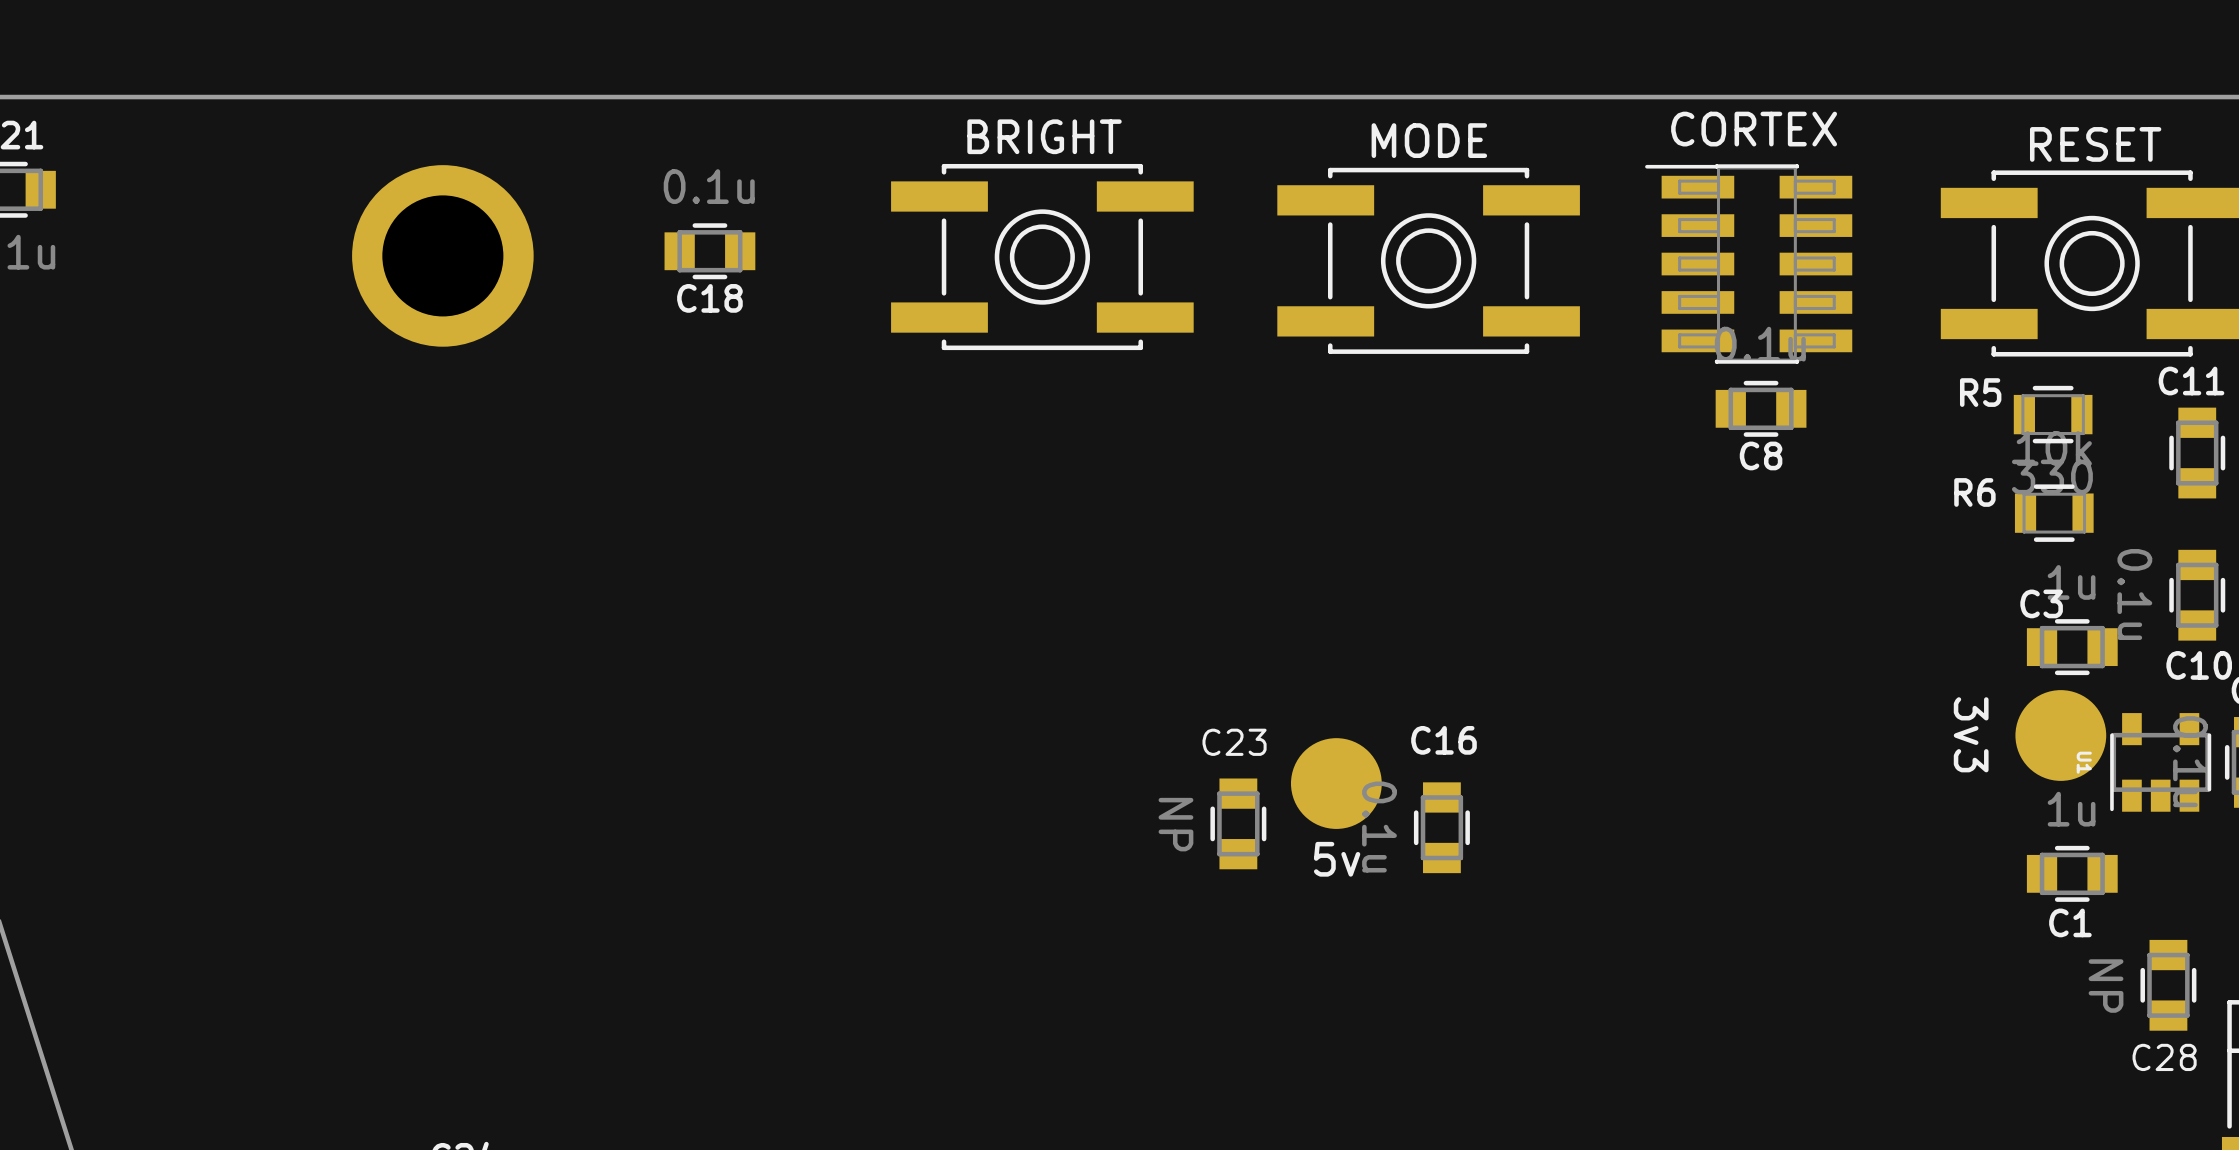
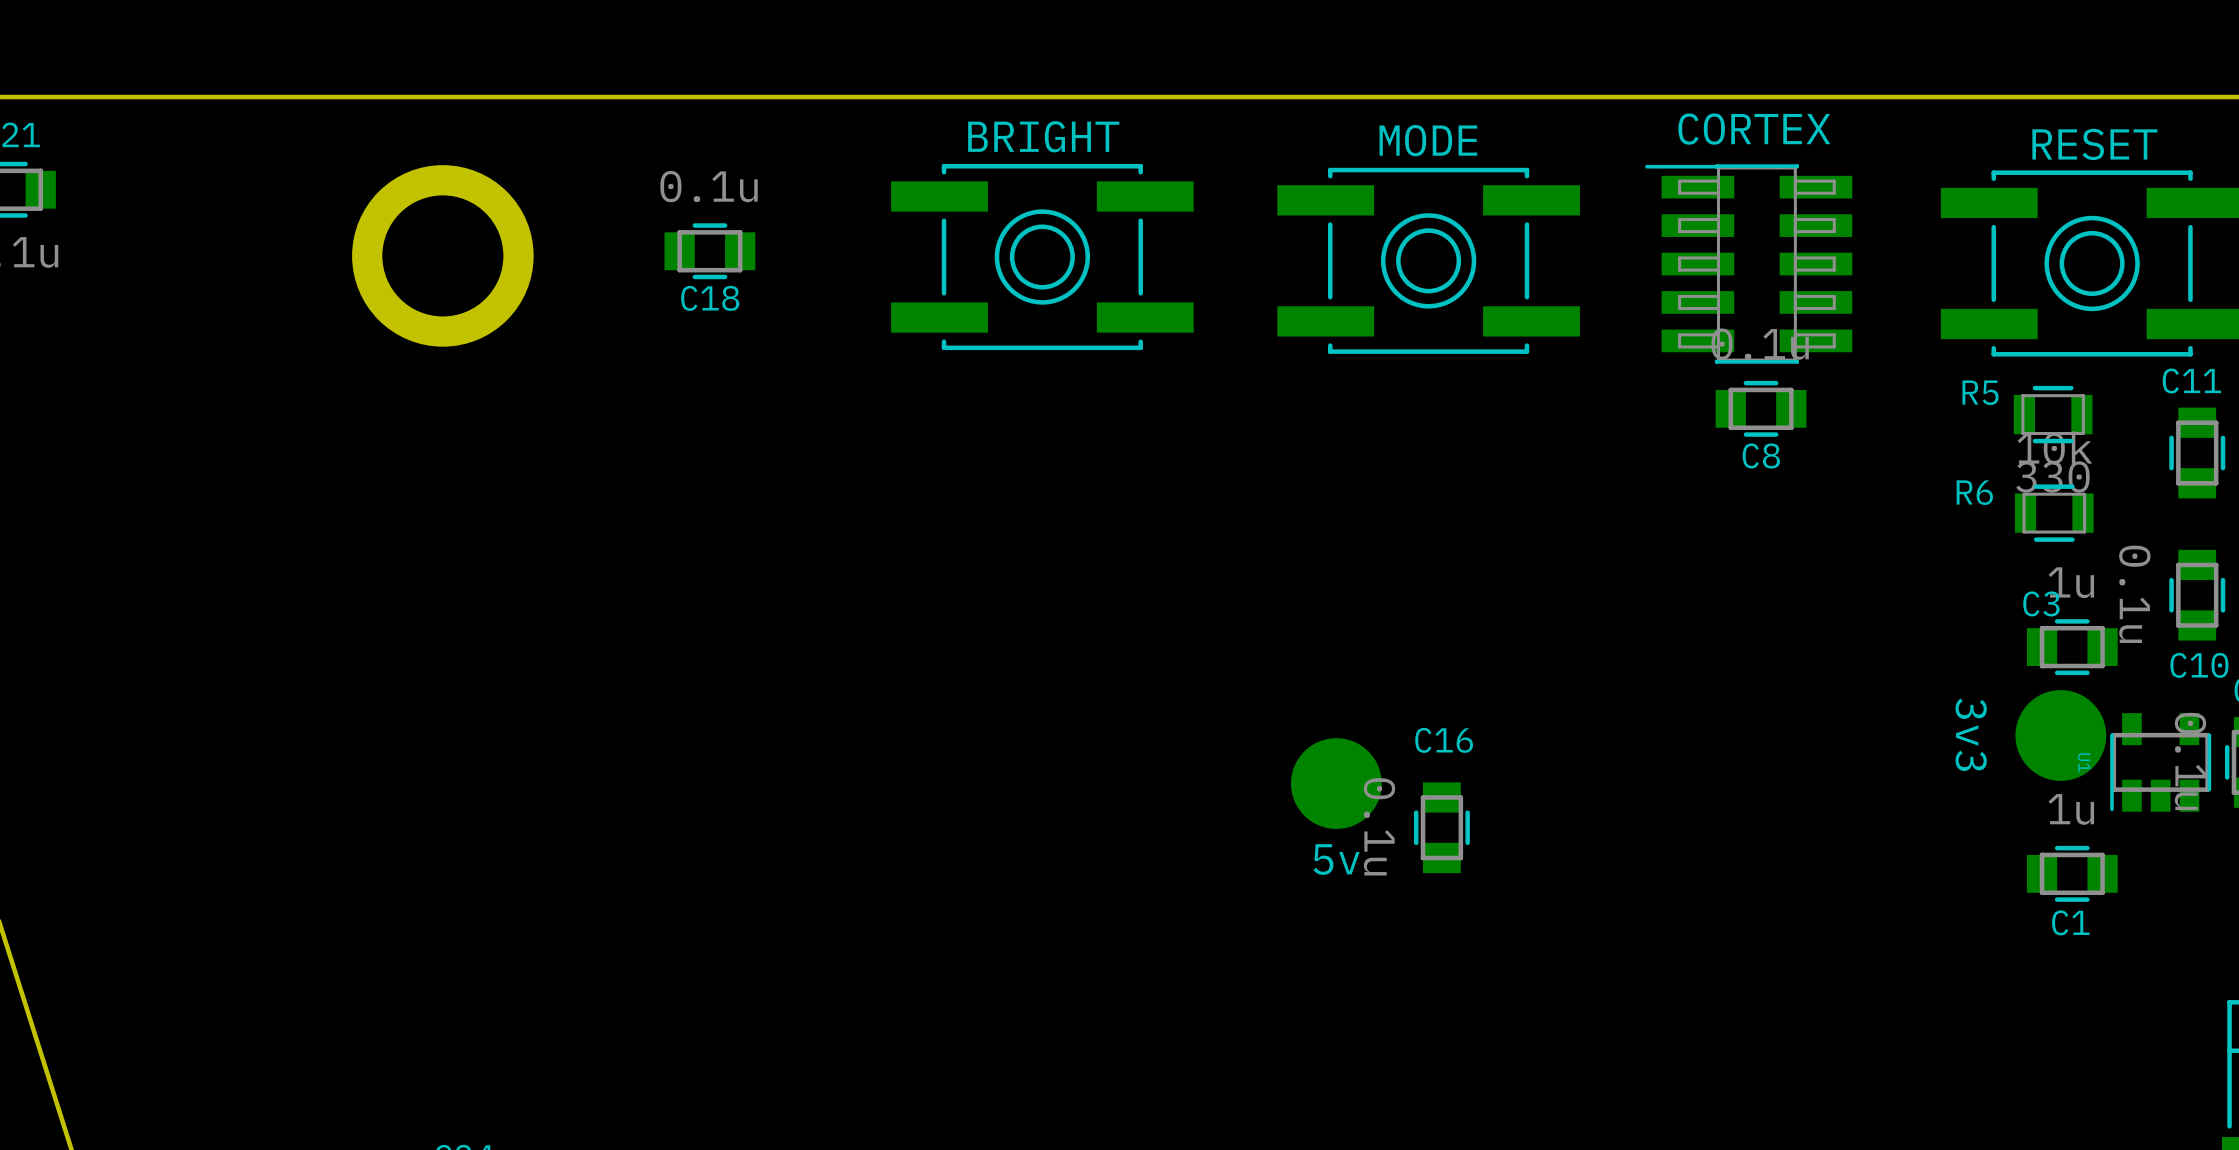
C23: NP (1238, 823) -> none
C28: NP (2168, 985) -> none

